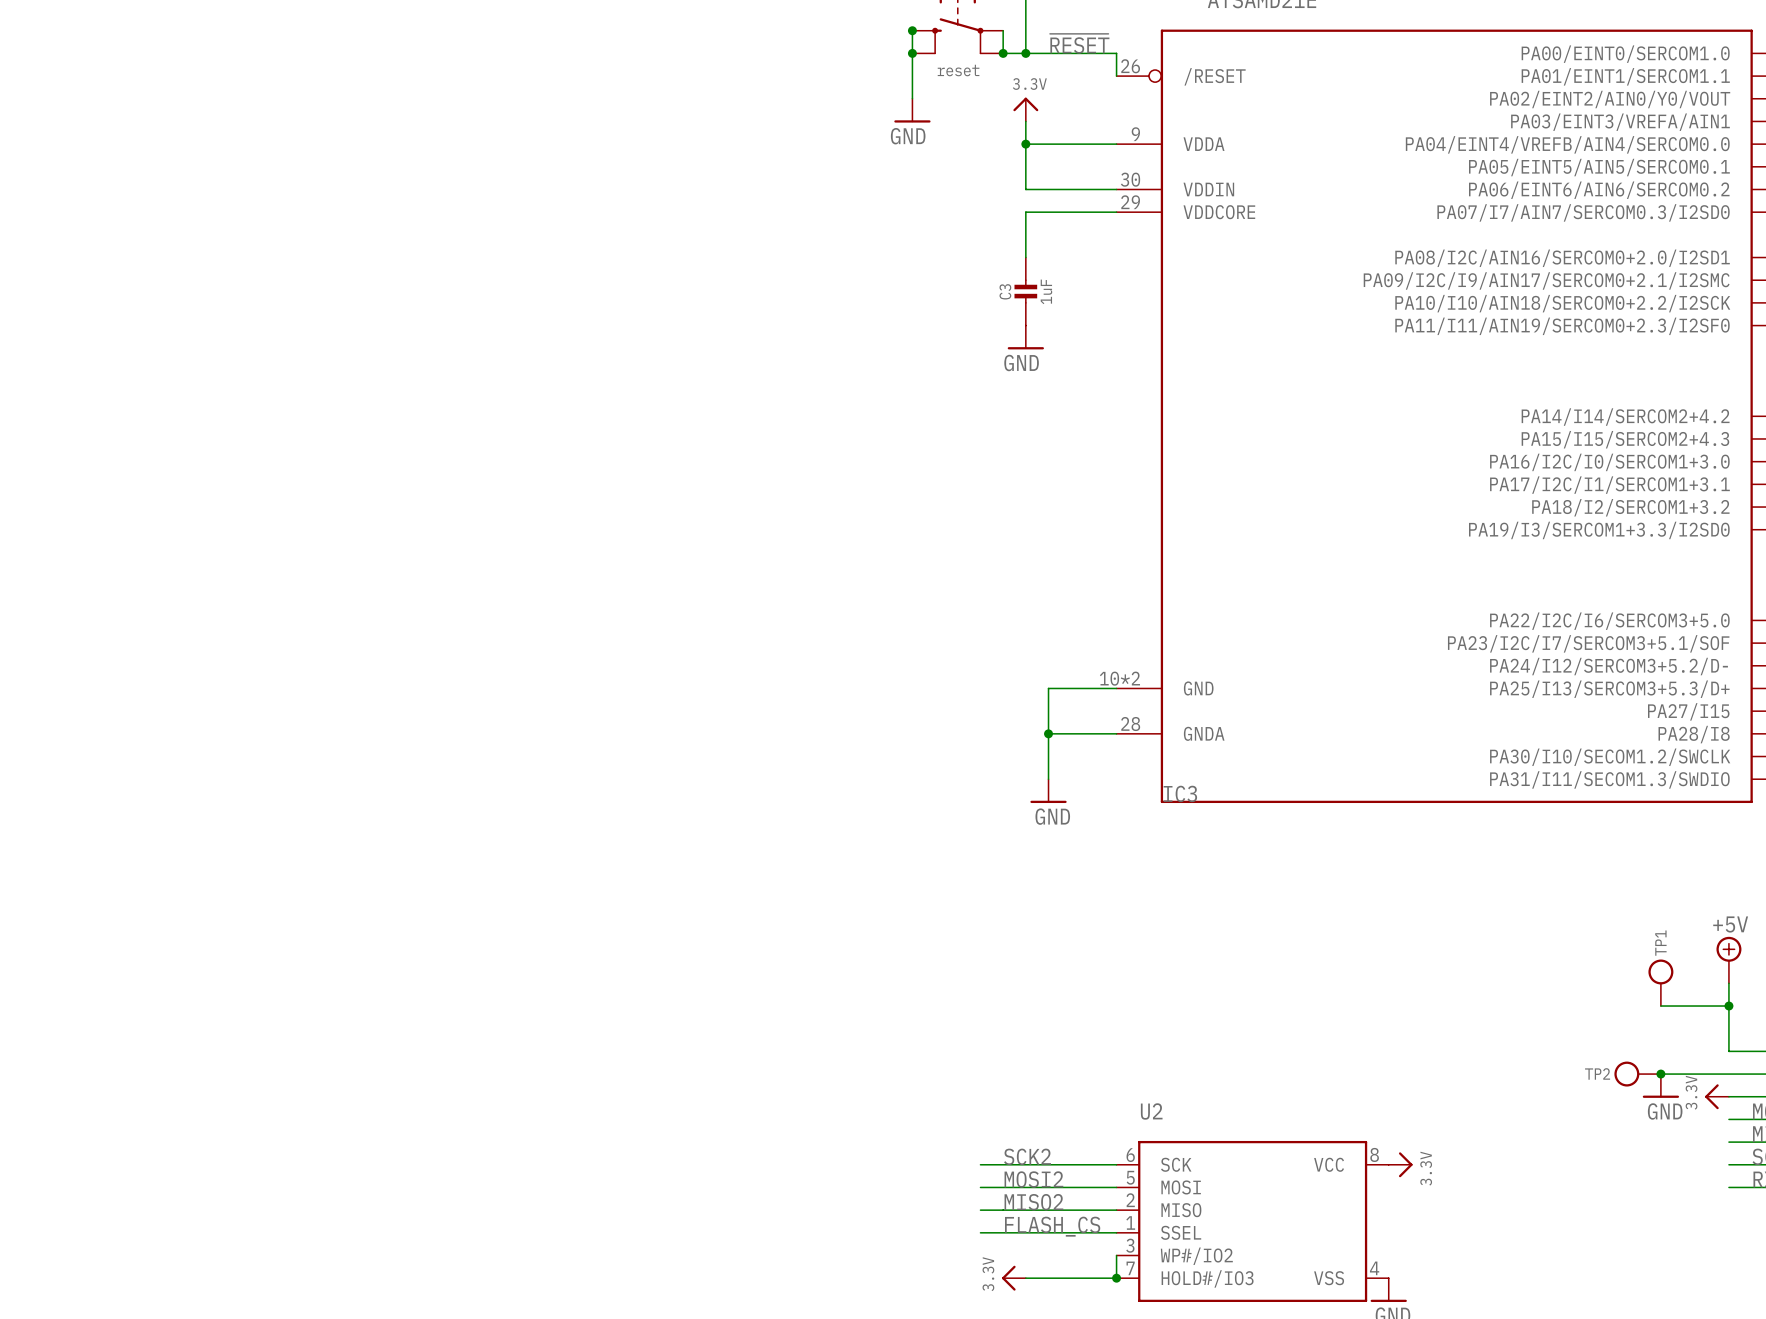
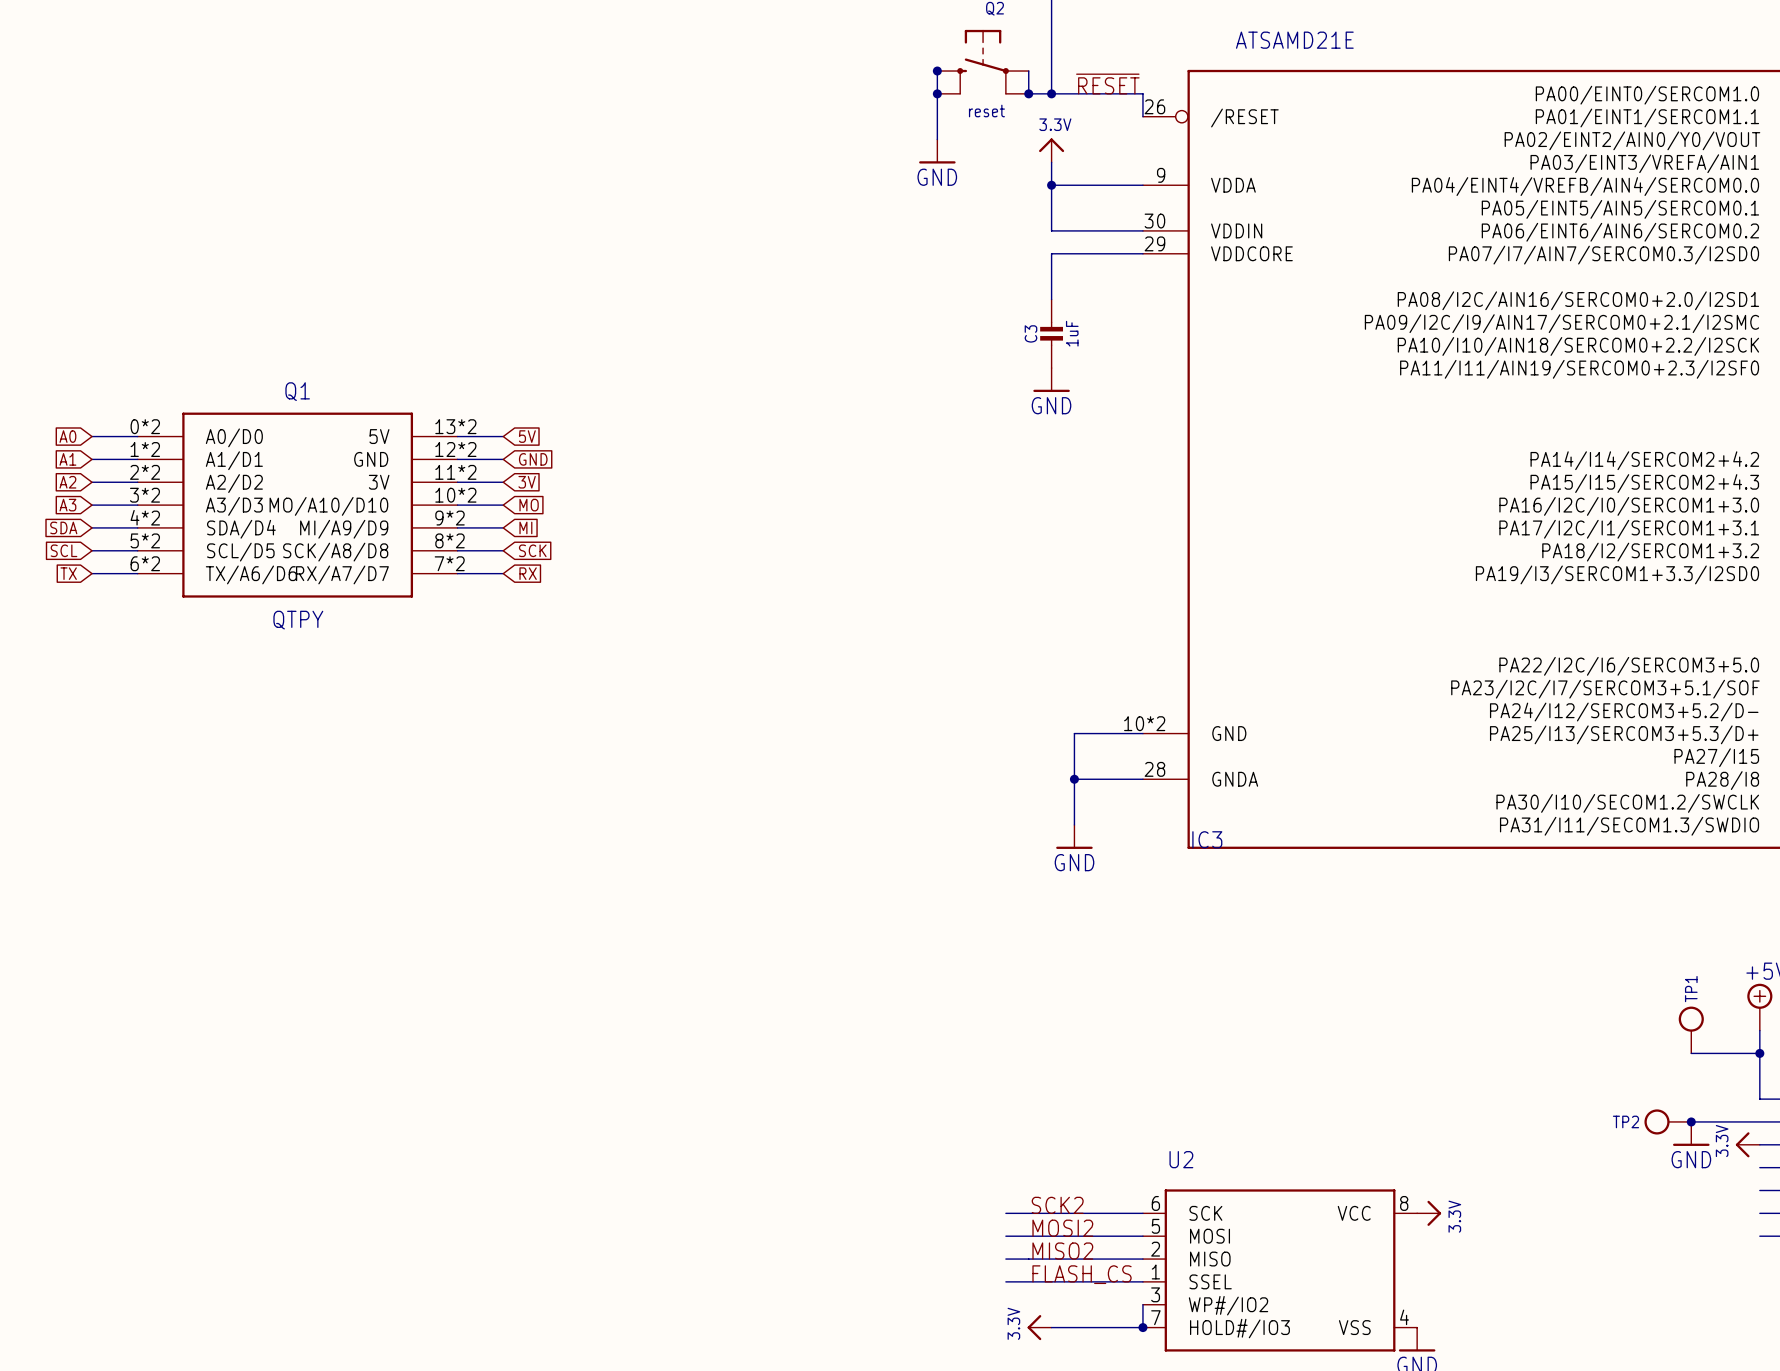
global label: none -> A0 (67, 436)
wire: none -> (92, 436) (137, 436)
wire: none -> (457, 436) (503, 436)
global label: none -> 5V (527, 436)
global label: none -> A1 (67, 459)
wire: none -> (92, 459) (137, 459)
wire: none -> (457, 459) (503, 459)
global label: none -> GND (533, 459)
global label: none -> A2 (67, 482)
wire: none -> (92, 482) (137, 482)
wire: none -> (457, 482) (503, 482)
global label: none -> 3V (527, 482)
global label: none -> A3 (67, 505)
wire: none -> (92, 505) (137, 505)
Q1: none -> QTPY (297, 505)
wire: none -> (457, 505) (503, 505)
global label: none -> MO (529, 505)
global label: none -> SDA (63, 527)
wire: none -> (92, 527) (137, 527)
wire: none -> (457, 527) (503, 527)
global label: none -> MI (525, 527)
global label: none -> SCL (64, 550)
wire: none -> (92, 550) (137, 550)
wire: none -> (457, 550) (503, 550)
global label: none -> SCK (532, 550)
global label: none -> TX (68, 573)
wire: none -> (92, 573) (137, 573)
wire: none -> (457, 573) (503, 573)
global label: none -> RX (528, 573)

